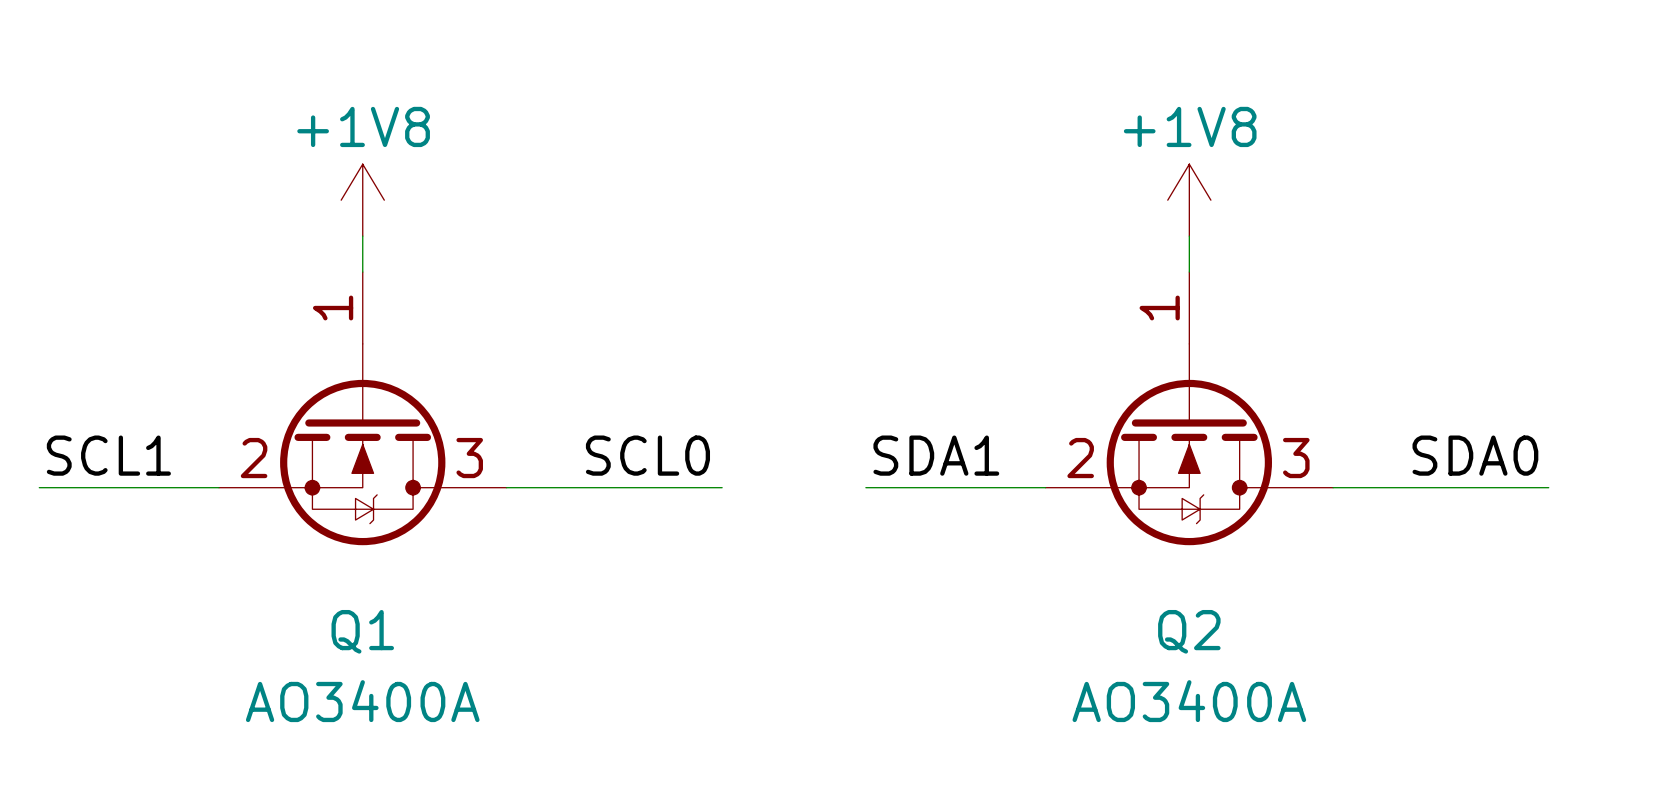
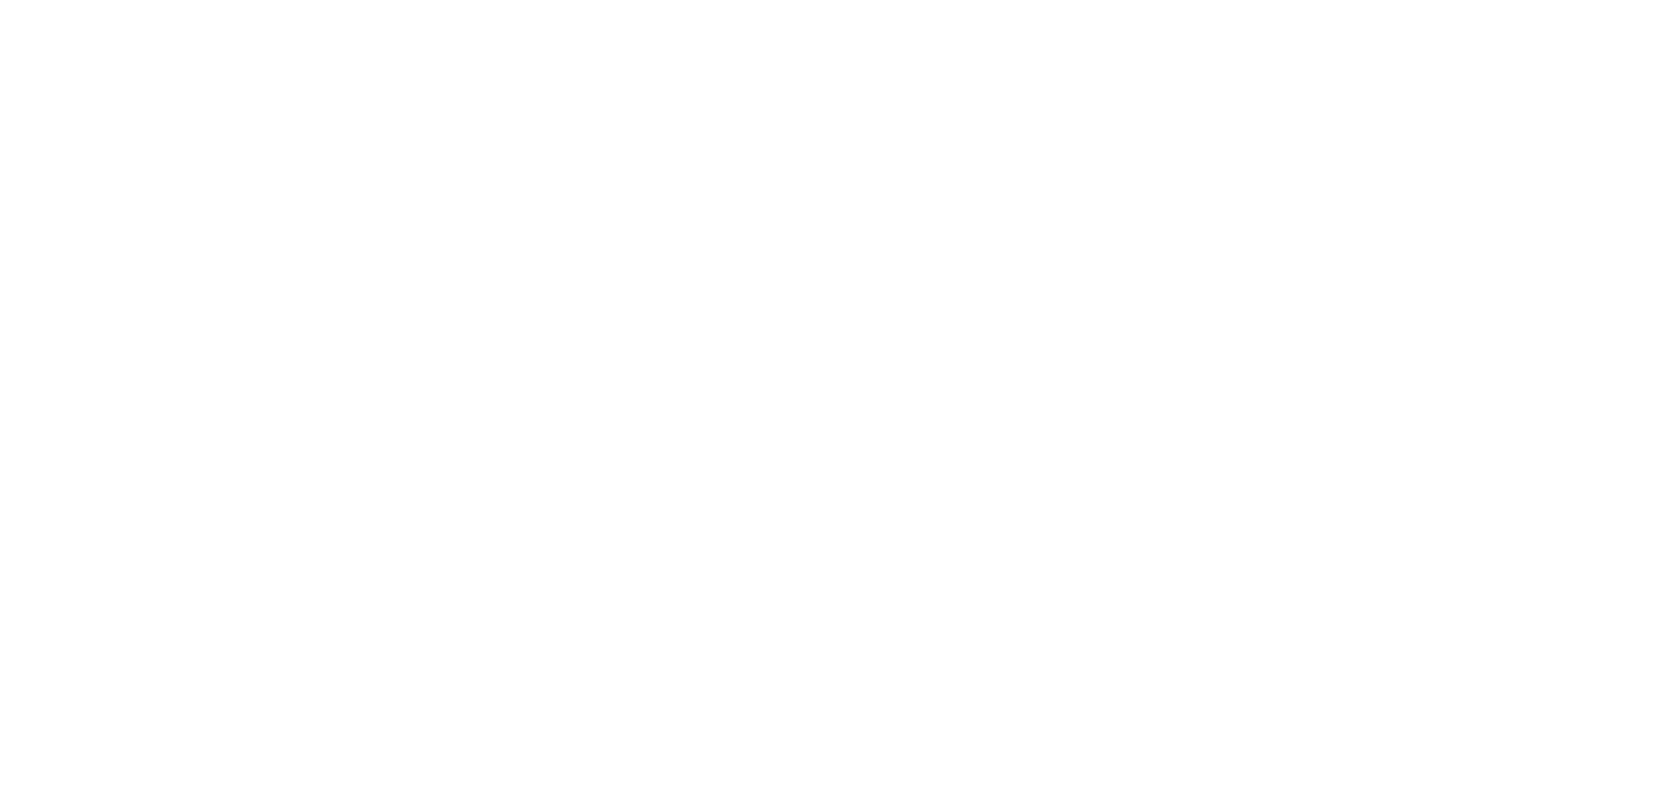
power symbol: +1V8 (362, 200) -> none
power symbol: +1V8 (1189, 200) -> none
wire: (362, 236) (362, 272) -> none
wire: (1189, 236) (1189, 272) -> none
Q1: AO3400A (362, 408) -> none
Q2: AO3400A (1189, 408) -> none
label: SCL1 (108, 455) -> none
label: SCL0 (647, 455) -> none
label: SDA1 (936, 455) -> none
label: SDA0 (1475, 455) -> none
wire: (39, 487) (218, 487) -> none
wire: (506, 487) (722, 487) -> none
wire: (865, 487) (1045, 487) -> none
wire: (1333, 487) (1548, 487) -> none

